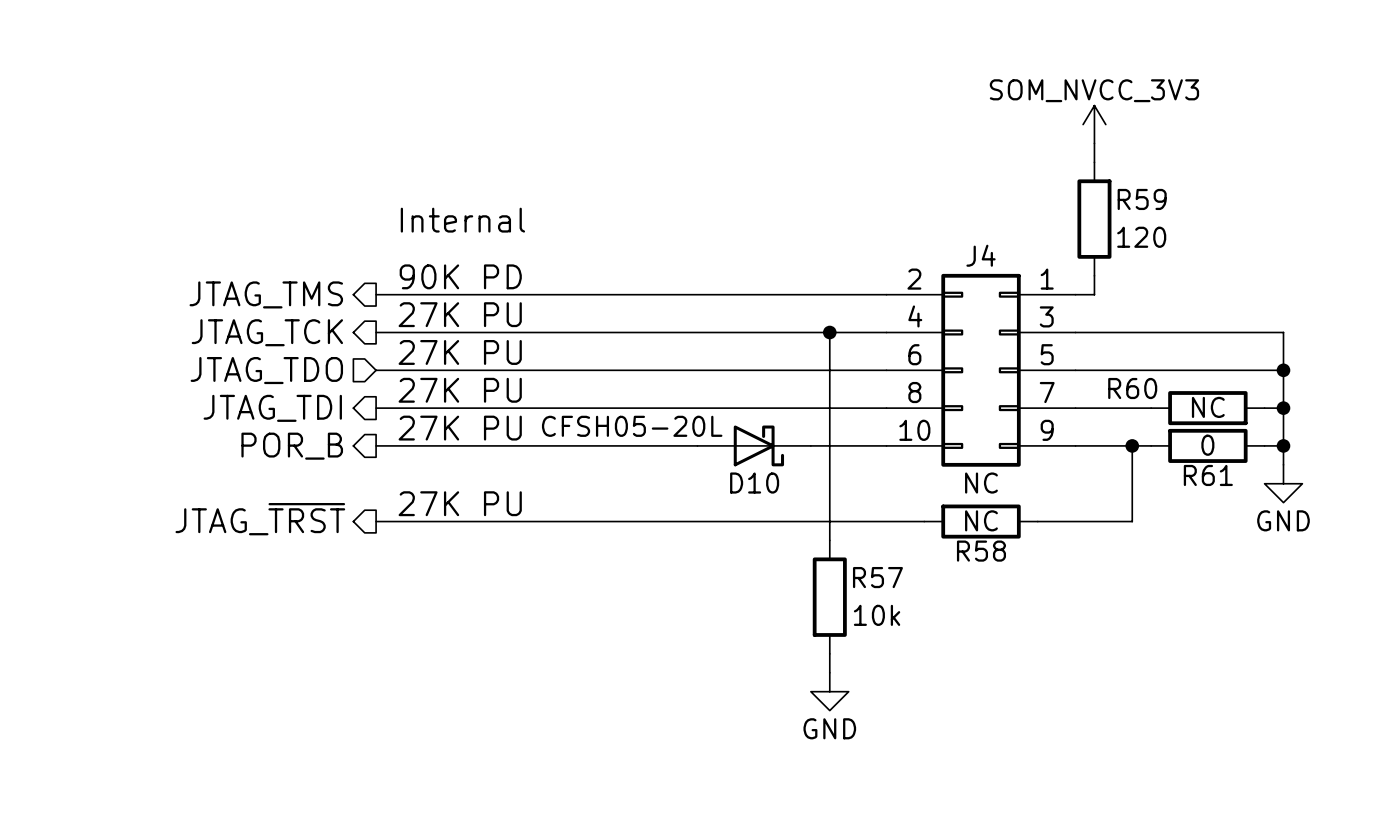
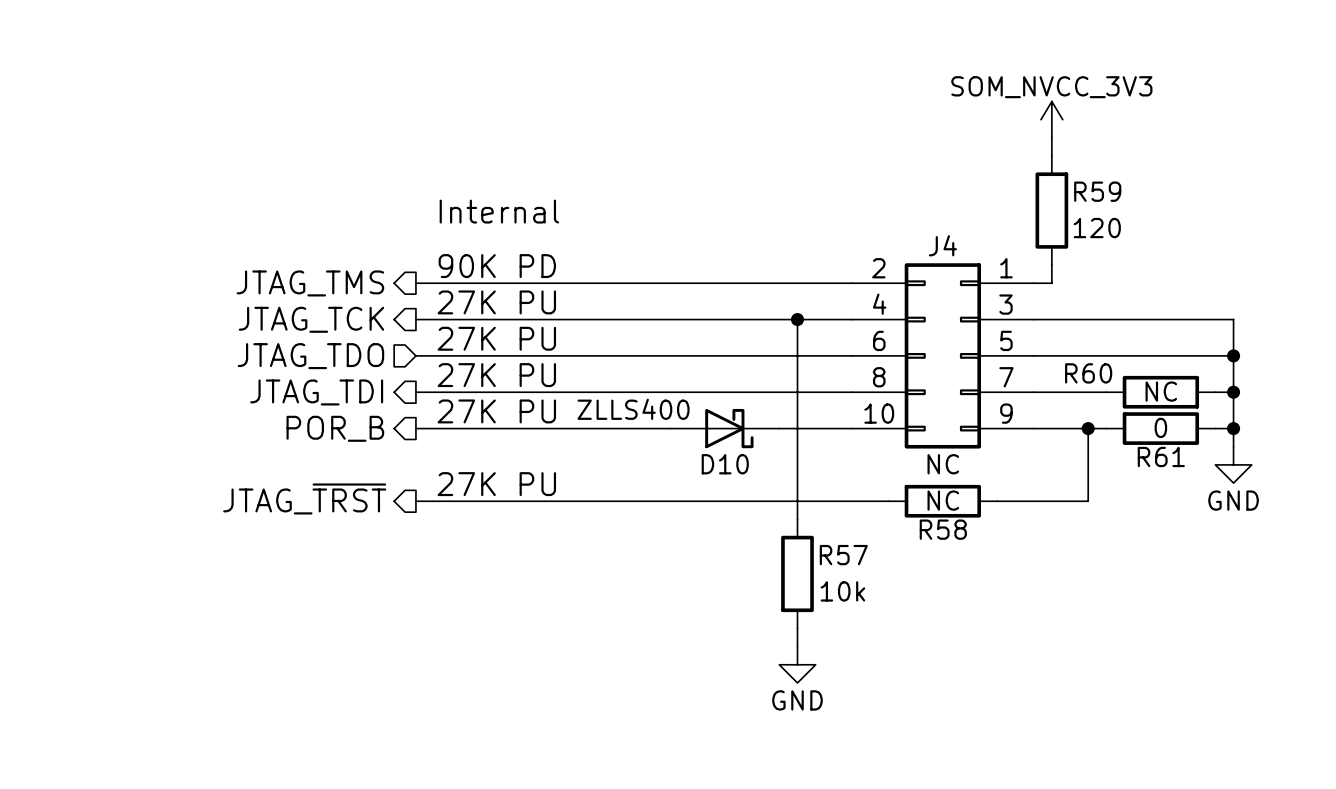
text position: Internal (462, 220) -> Internal (499, 211)
text position: 90K PD (460, 276) -> 90K PD (497, 266)
hierarchical label position: JTAG_TMS (266, 294) -> JTAG_TMS (310, 283)
wire: (376, 294) (432, 294) -> none
text: 27K PU (460, 314) -> none
text: none -> 27K PU (496, 302)
hierarchical label position: JTAG_TCK (267, 332) -> JTAG_TCK (311, 319)
wire: (376, 332) (432, 332) -> none
text: 27K PU (460, 352) -> none
text: none -> 27K PU (496, 338)
hierarchical label position: JTAG_TDO (266, 370) -> JTAG_TDO (310, 356)
wire: (376, 370) (432, 370) -> none
text: 27K PU (460, 390) -> none
text: none -> 27K PU (496, 375)
hierarchical label position: JTAG_TDI (272, 408) -> JTAG_TDI (316, 392)
wire: (376, 408) (432, 408) -> none
D10 value: CFSH05-20L (632, 426) -> ZLLS400 (633, 409)
text: 27K PU (460, 428) -> none
text: none -> 27K PU (496, 411)
wire: (376, 445) (432, 445) -> none
hierarchical label position: POR_B (292, 446) -> POR_B (335, 428)
text position: 27K PU (460, 503) -> 27K PU (496, 484)
hierarchical label position: JTAG_~{TRST} (260, 519) -> JTAG_~{TRST} (304, 498)
wire: (376, 521) (432, 521) -> none

